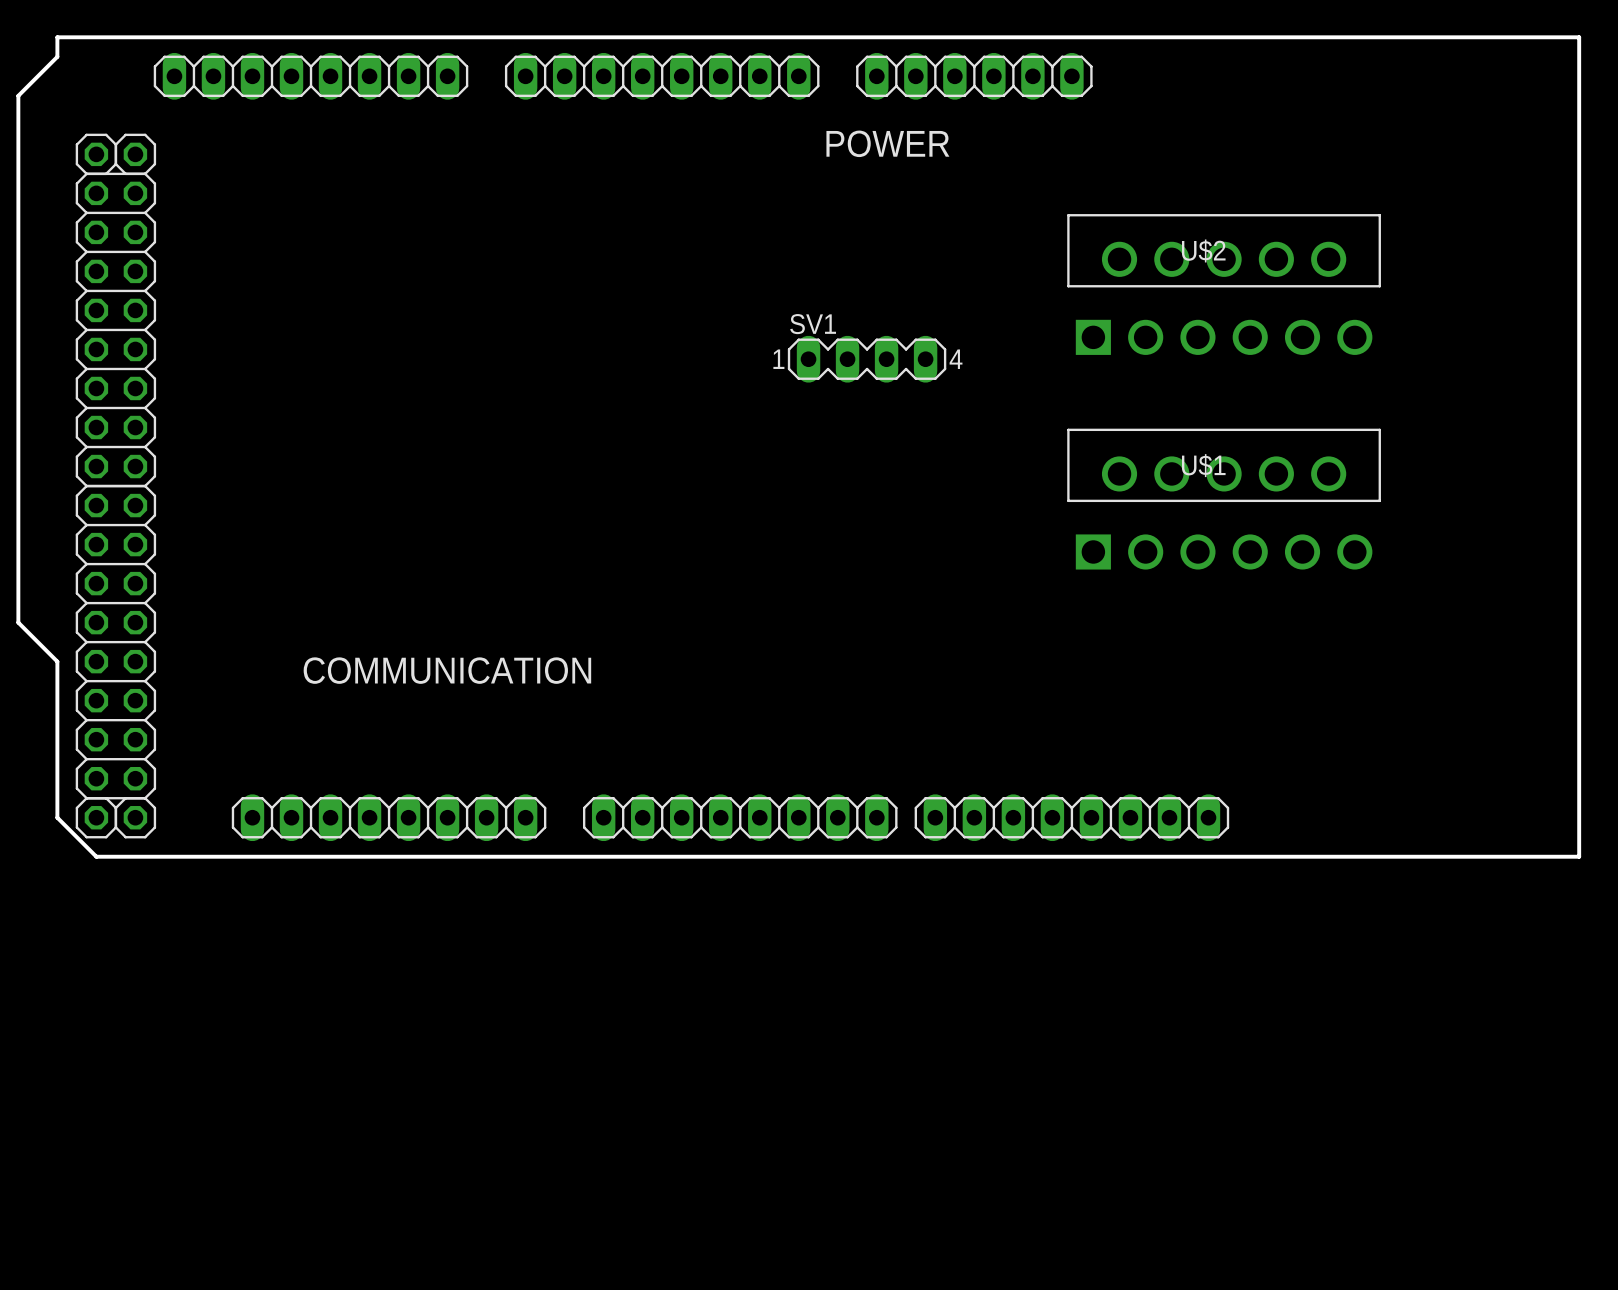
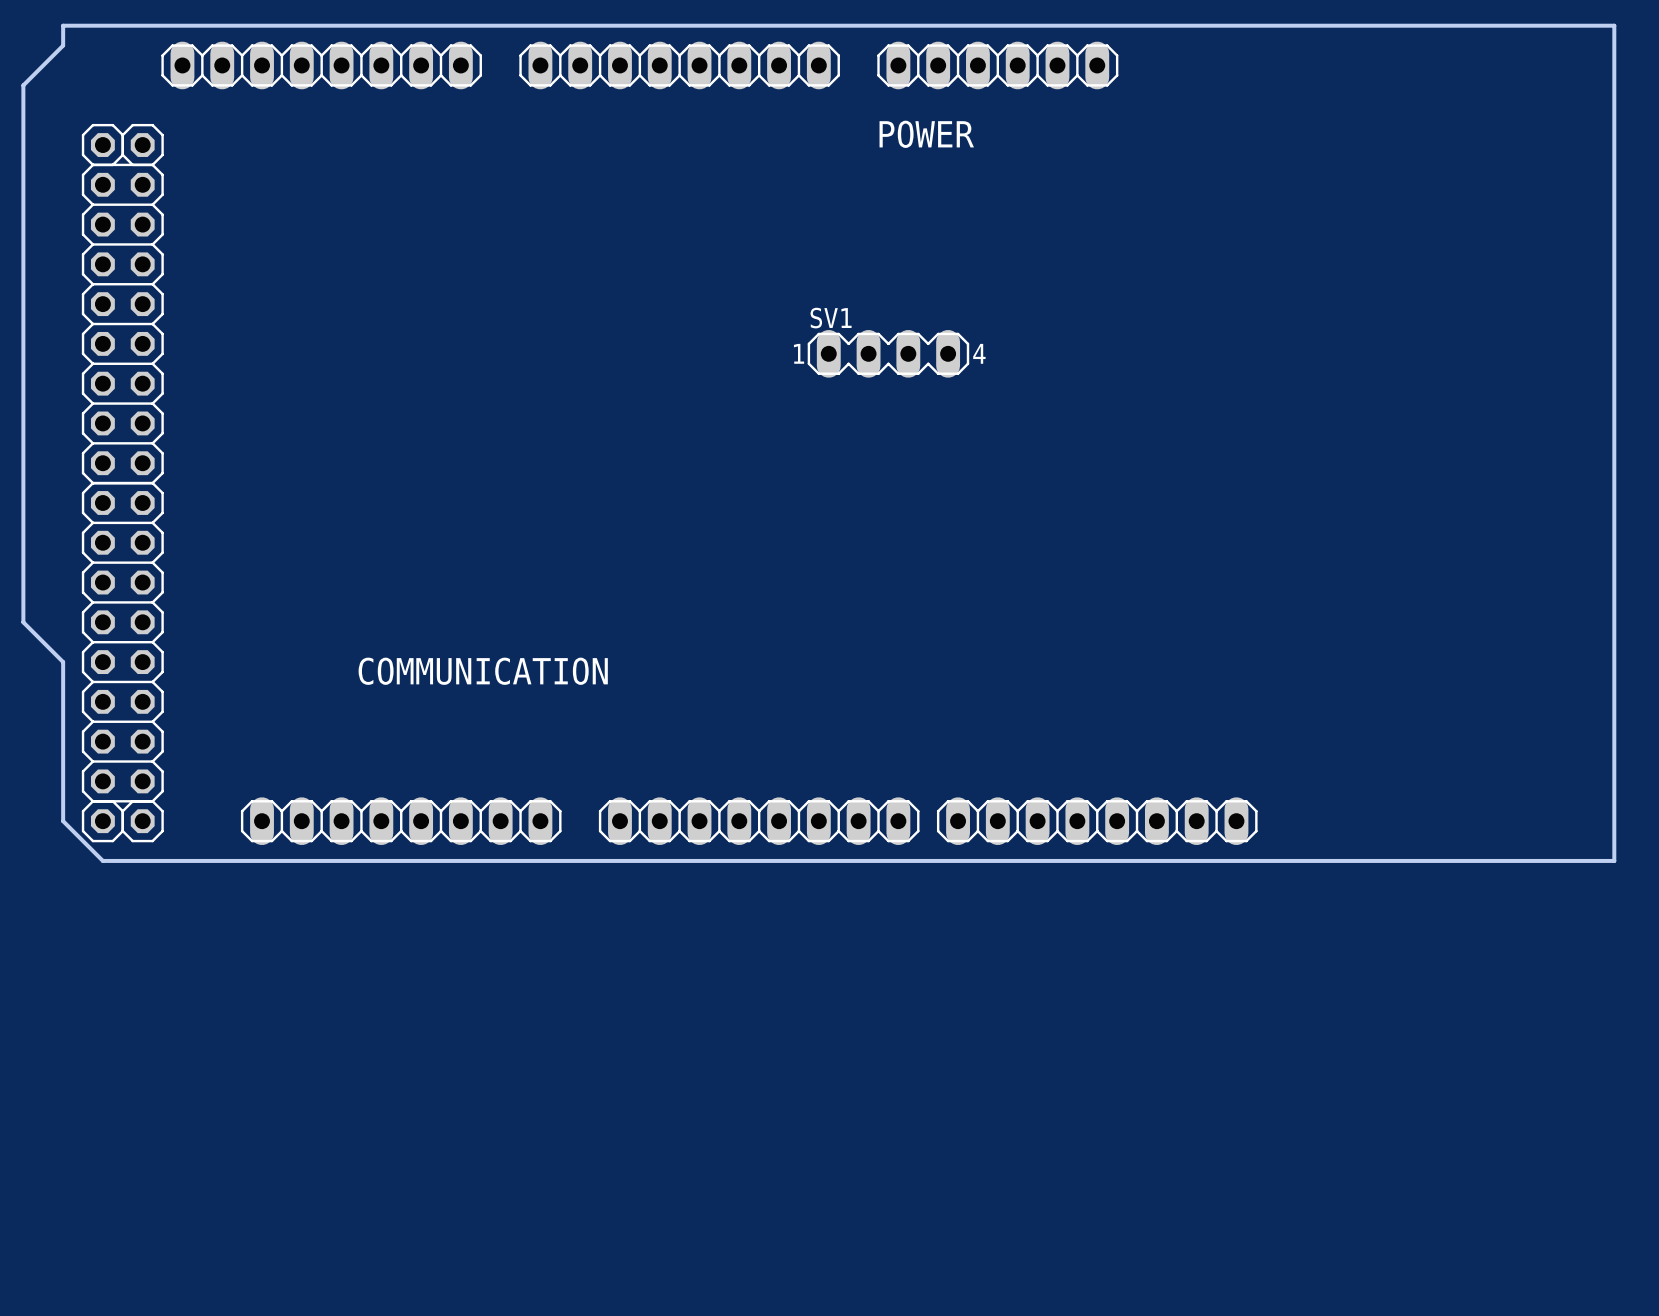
U$2: (1224, 284) -> none
U$1: (1224, 499) -> none

